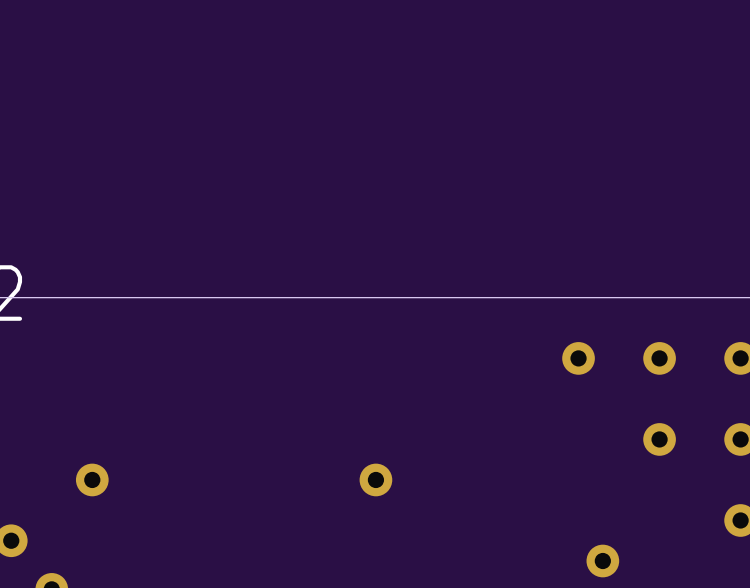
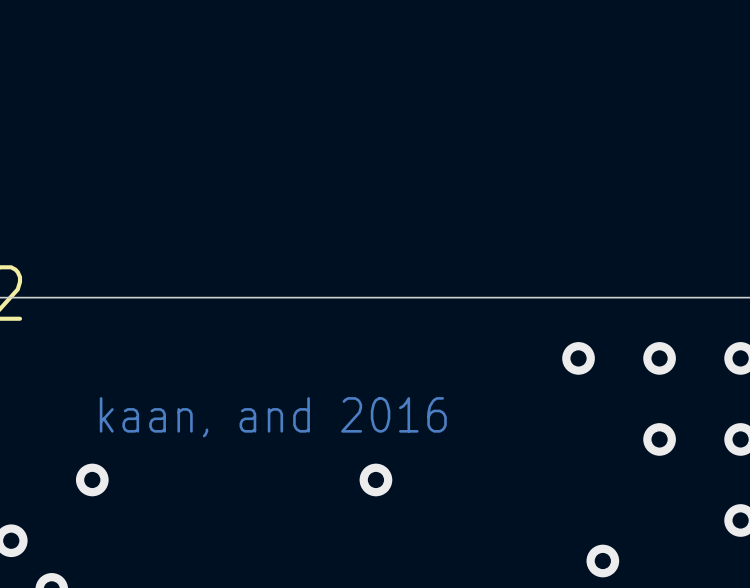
text: none -> kaan, and 2016 (273, 417)

